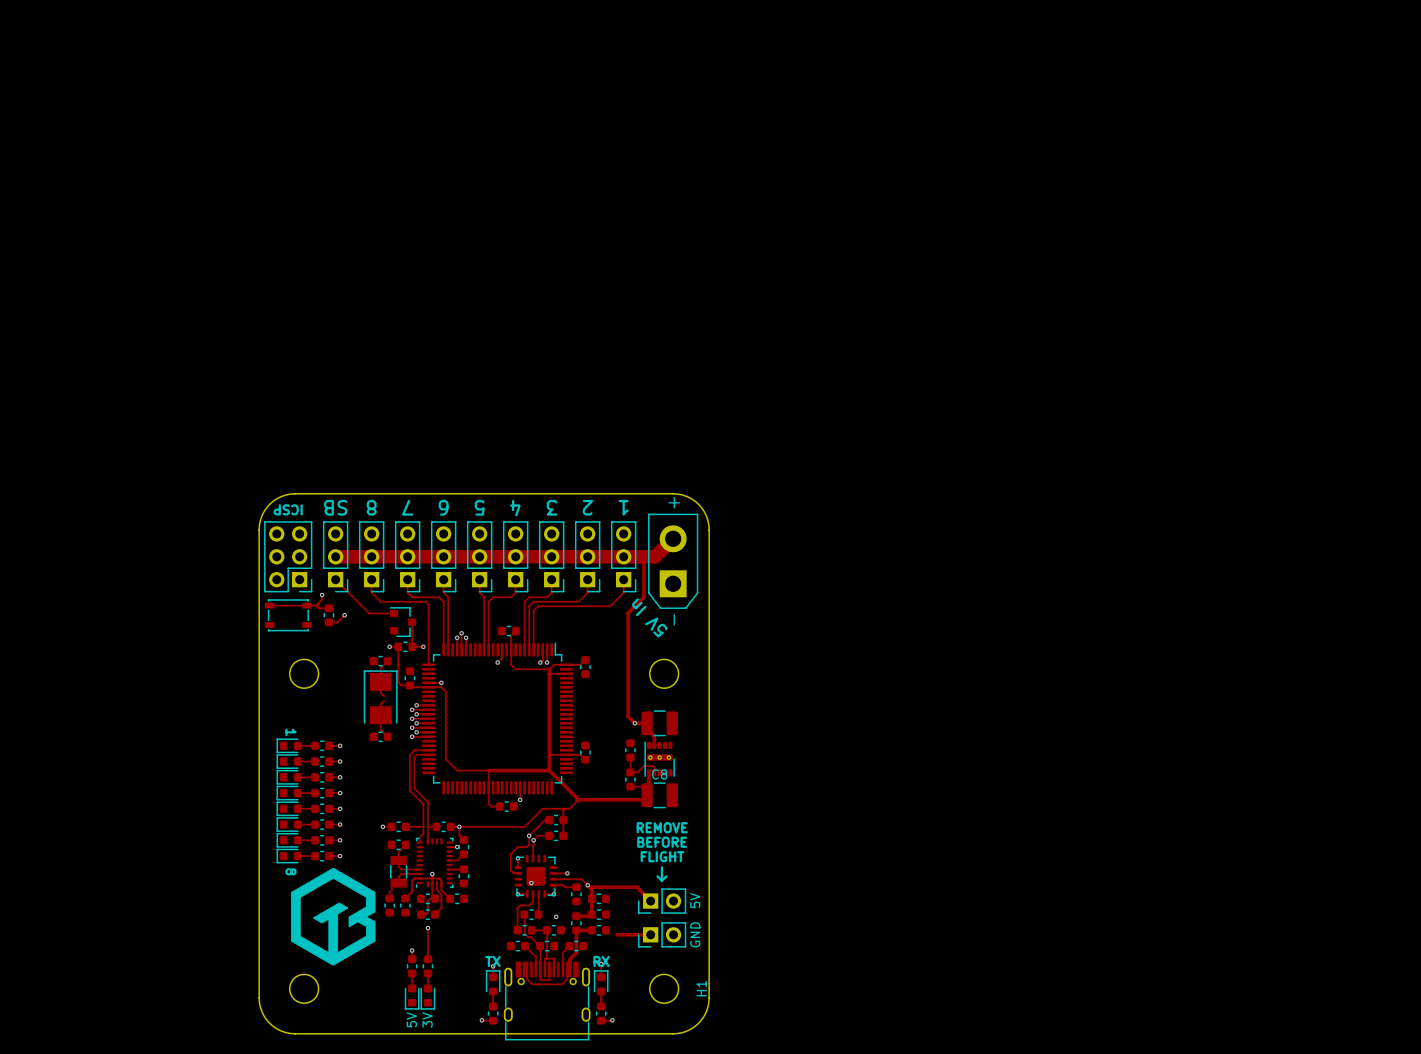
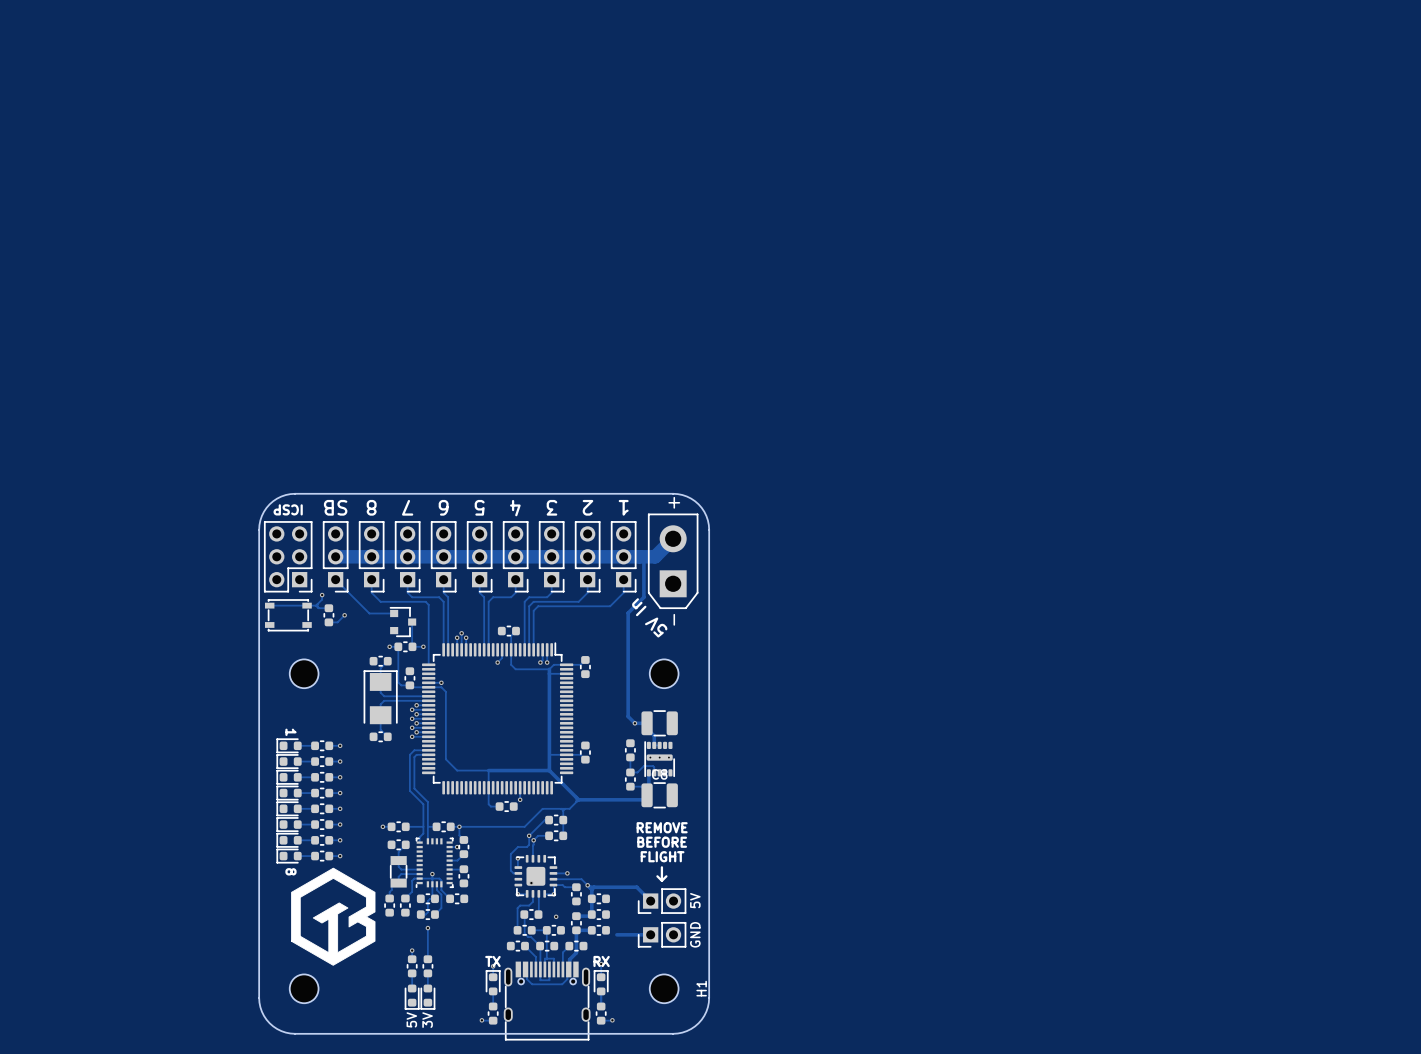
track: none -> (384, 696) (428, 696)
track: none -> (384, 700) (428, 700)

